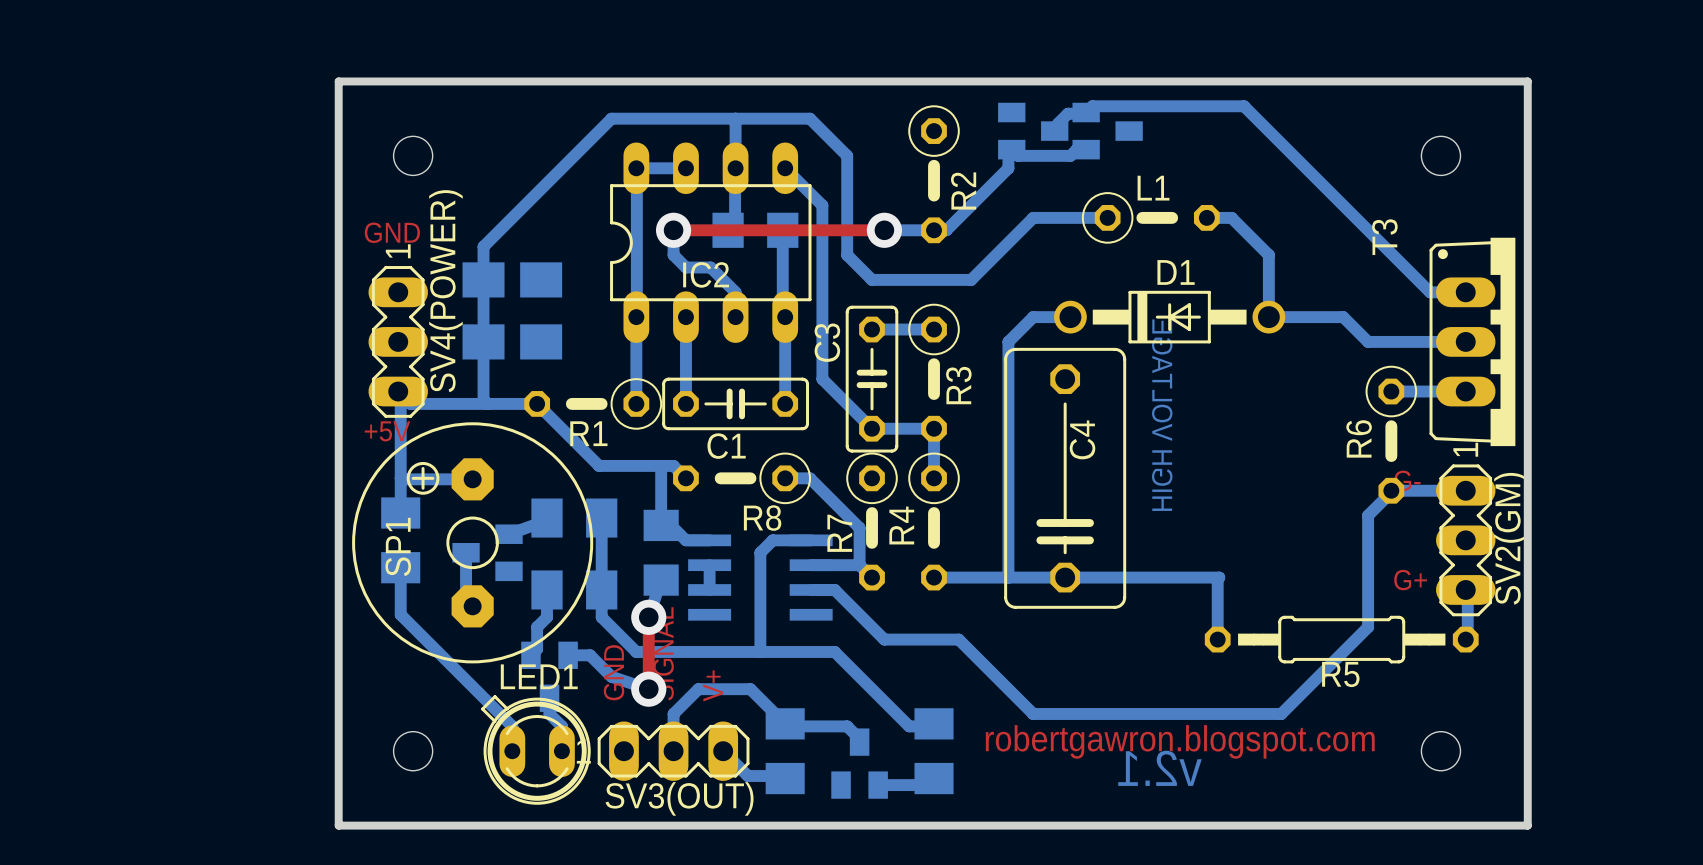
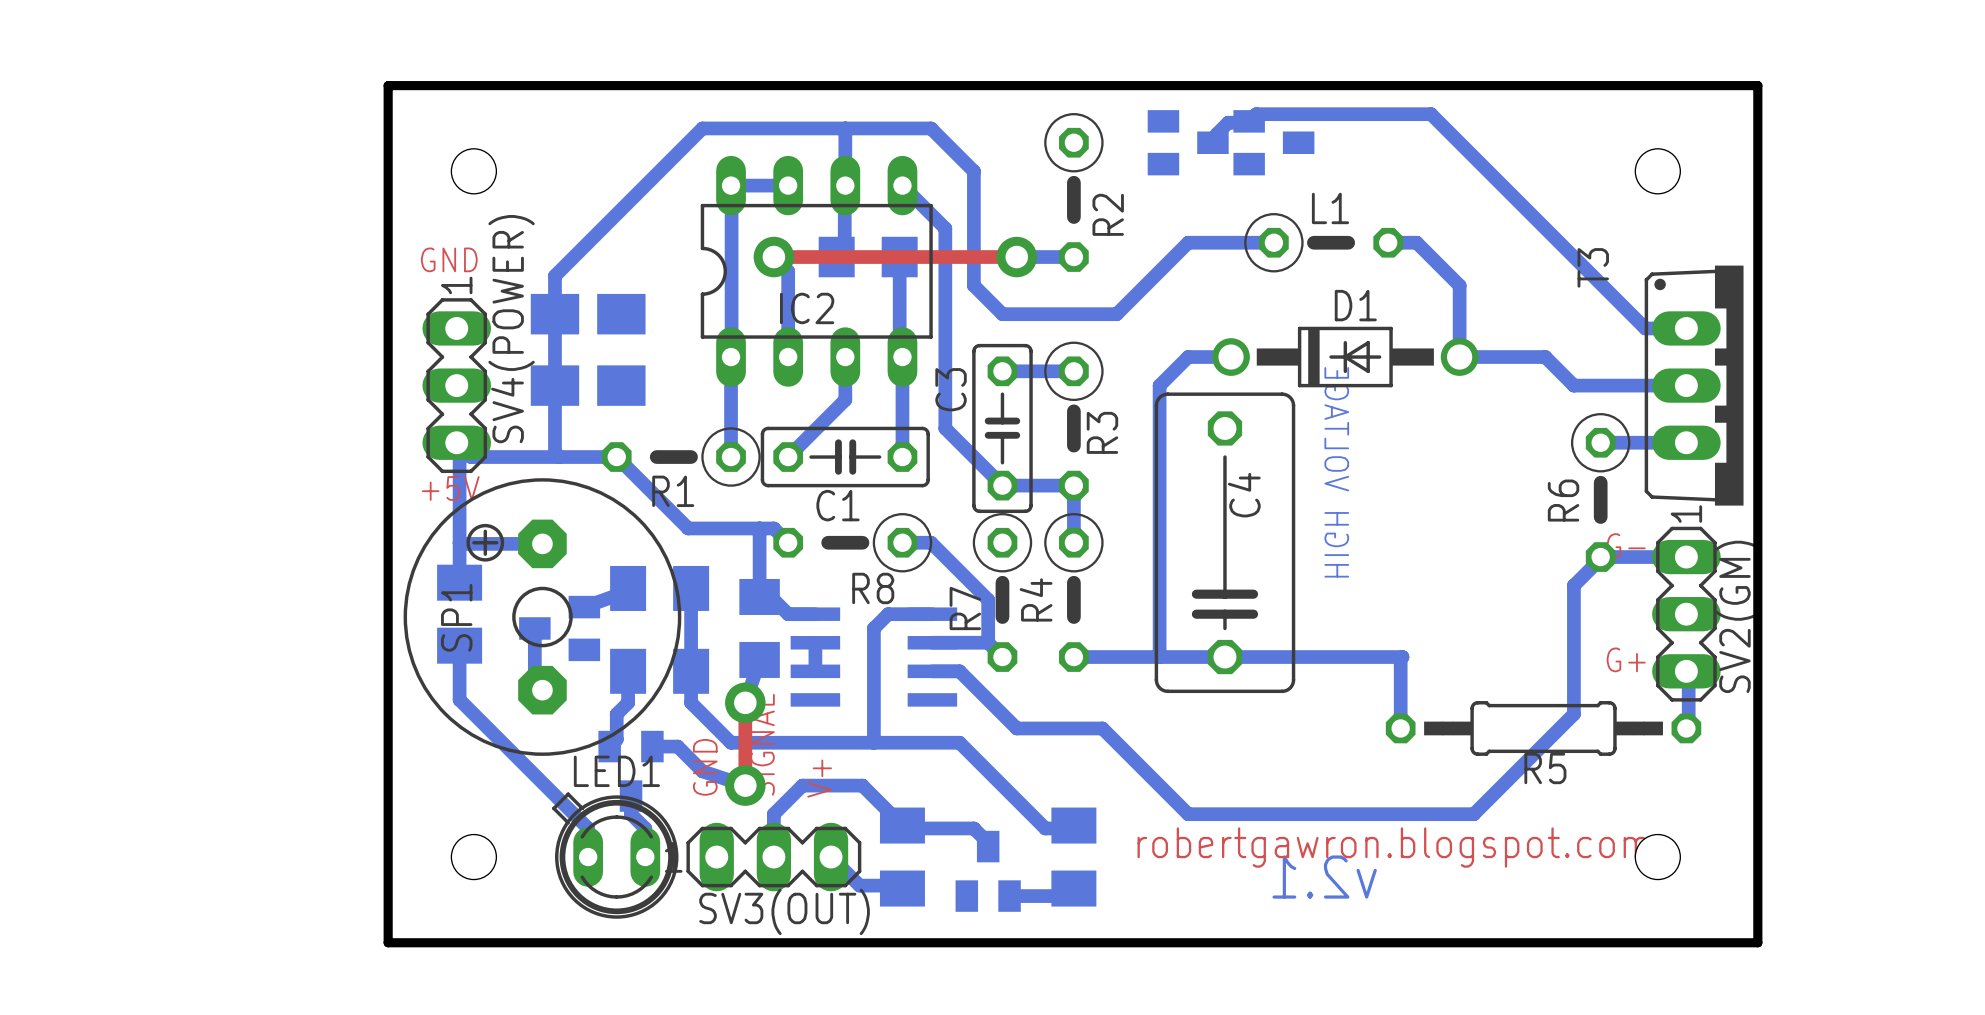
bottom track: (1086, 149) (1076, 149) (1070, 155) (1018, 155) (1011, 149) (1008, 152) (1008, 168) (946, 230) (934, 230) -> none
bottom track: (673, 230) (673, 255) (685, 267) (710, 267) (735, 292) (735, 317) -> (773, 257) (788, 271) (788, 357)
bottom track: (685, 317) (685, 403) -> (845, 357) (845, 399) (788, 457)

